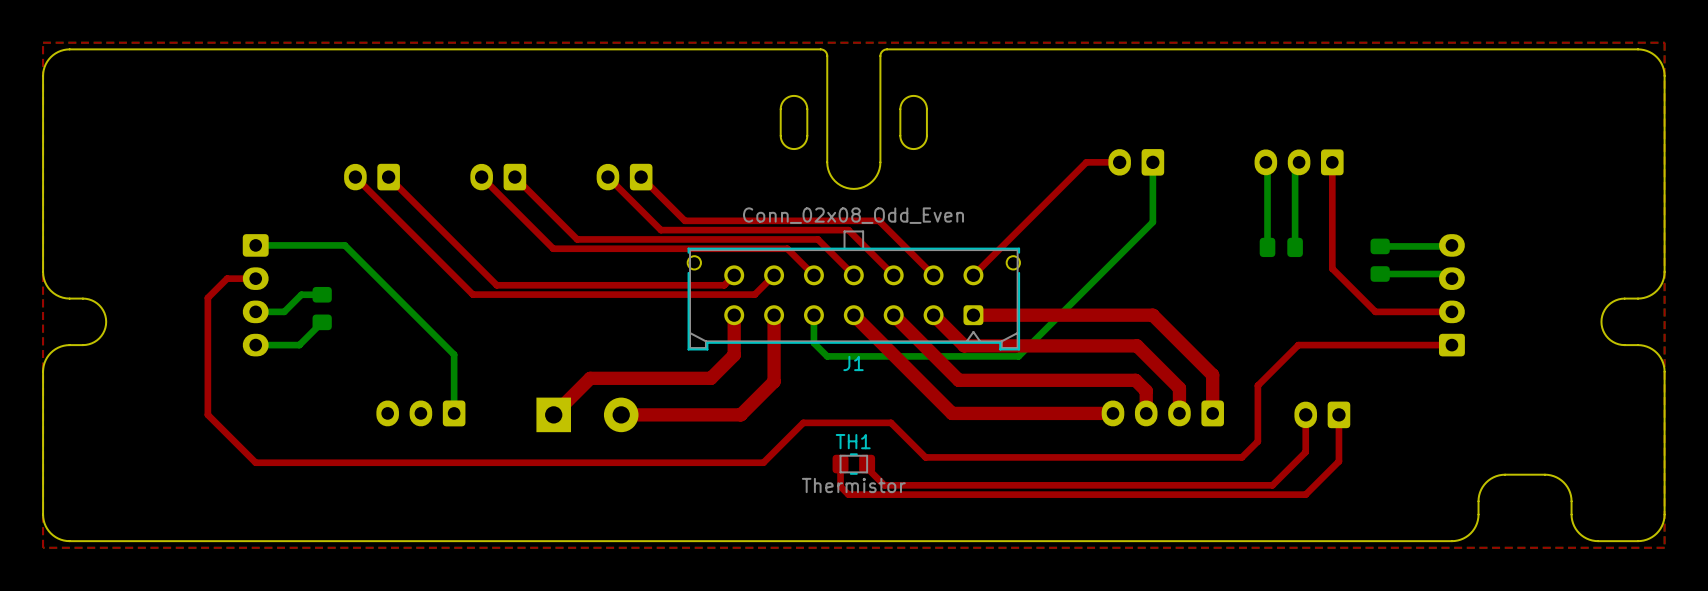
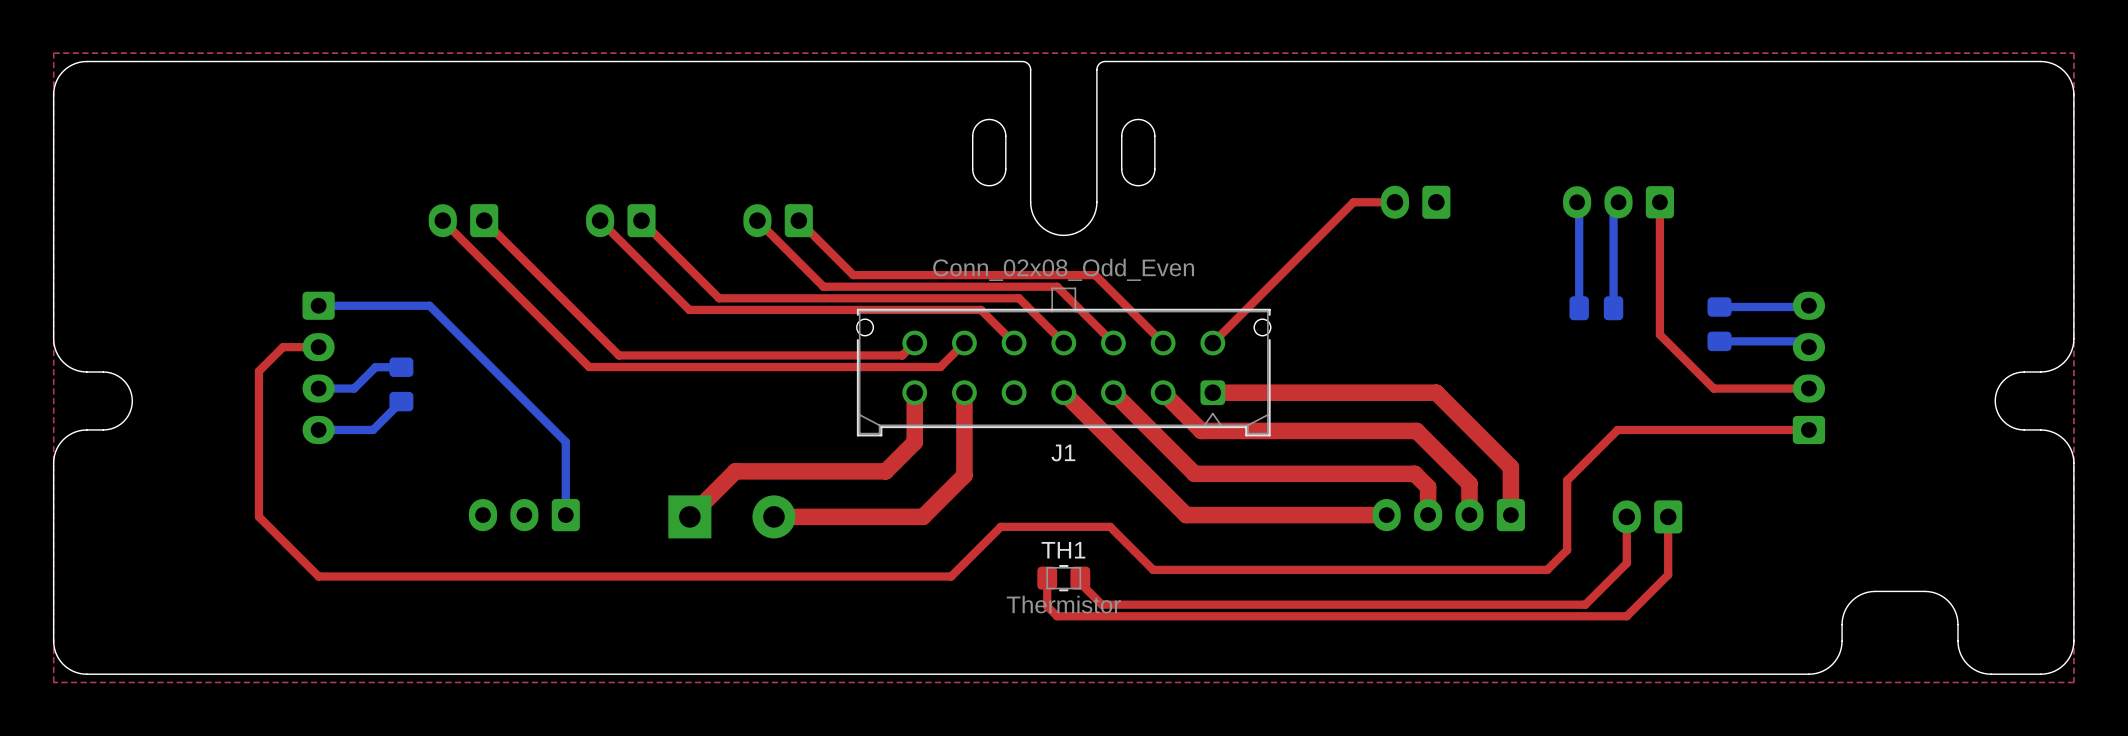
bottom track: (1152, 162) (1152, 222) (1018, 356) (827, 356) (813, 343) (813, 315) -> none

